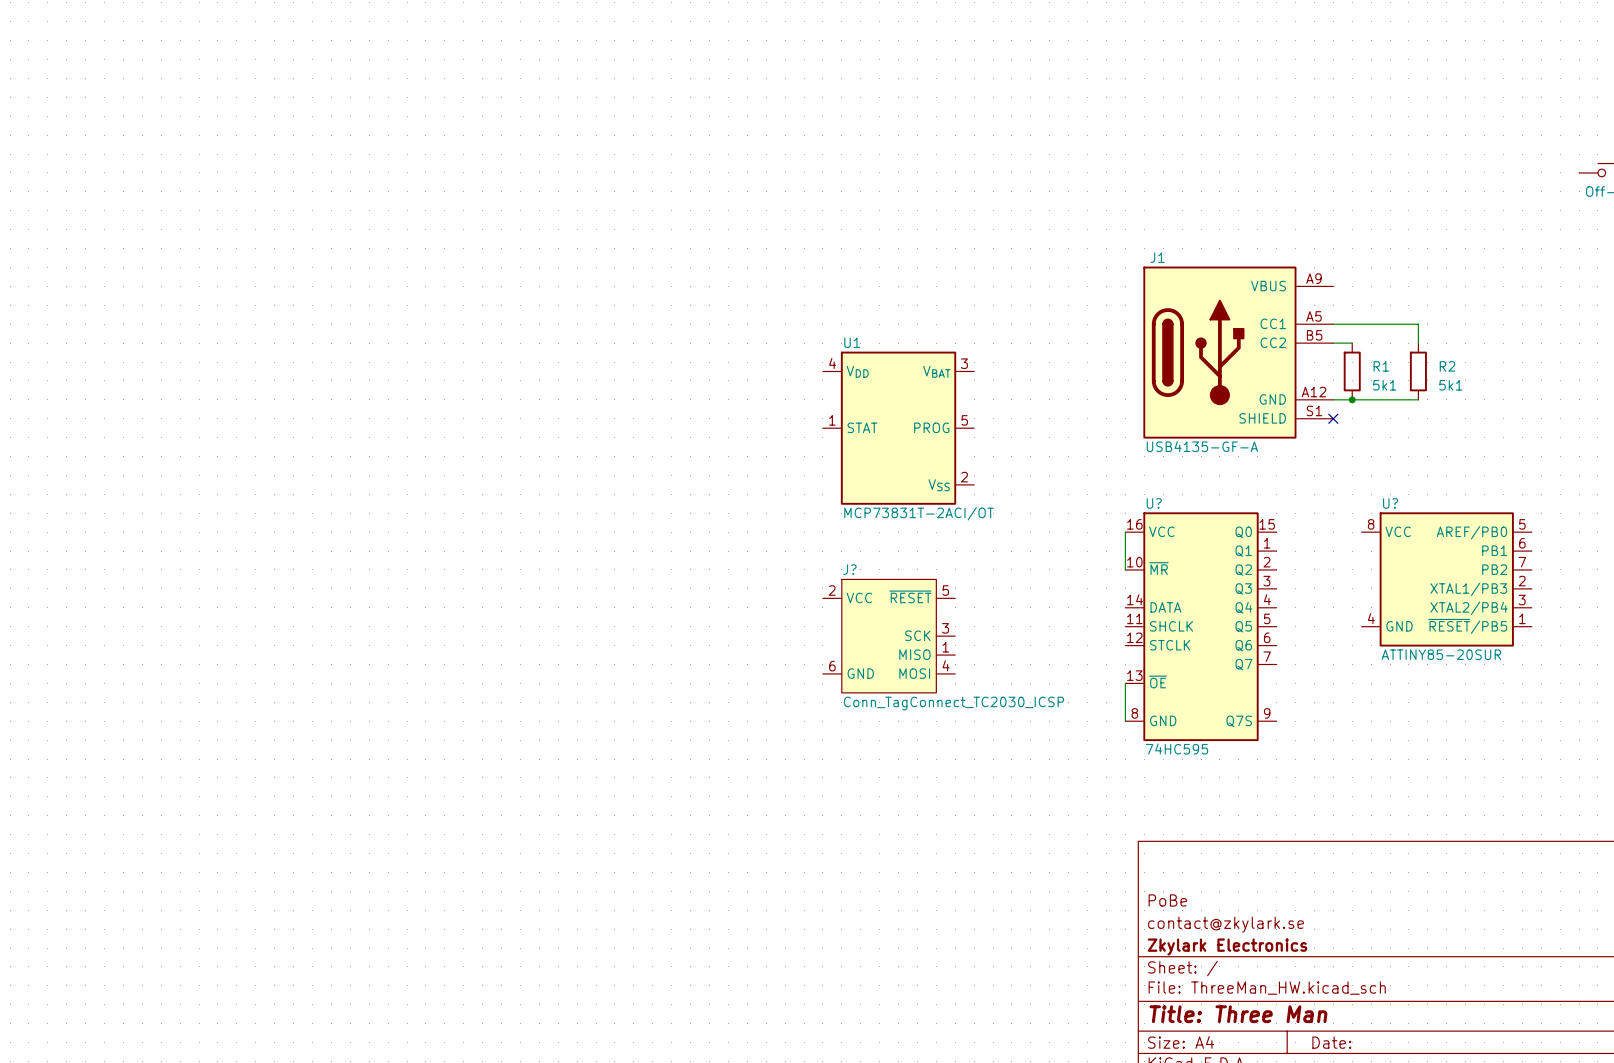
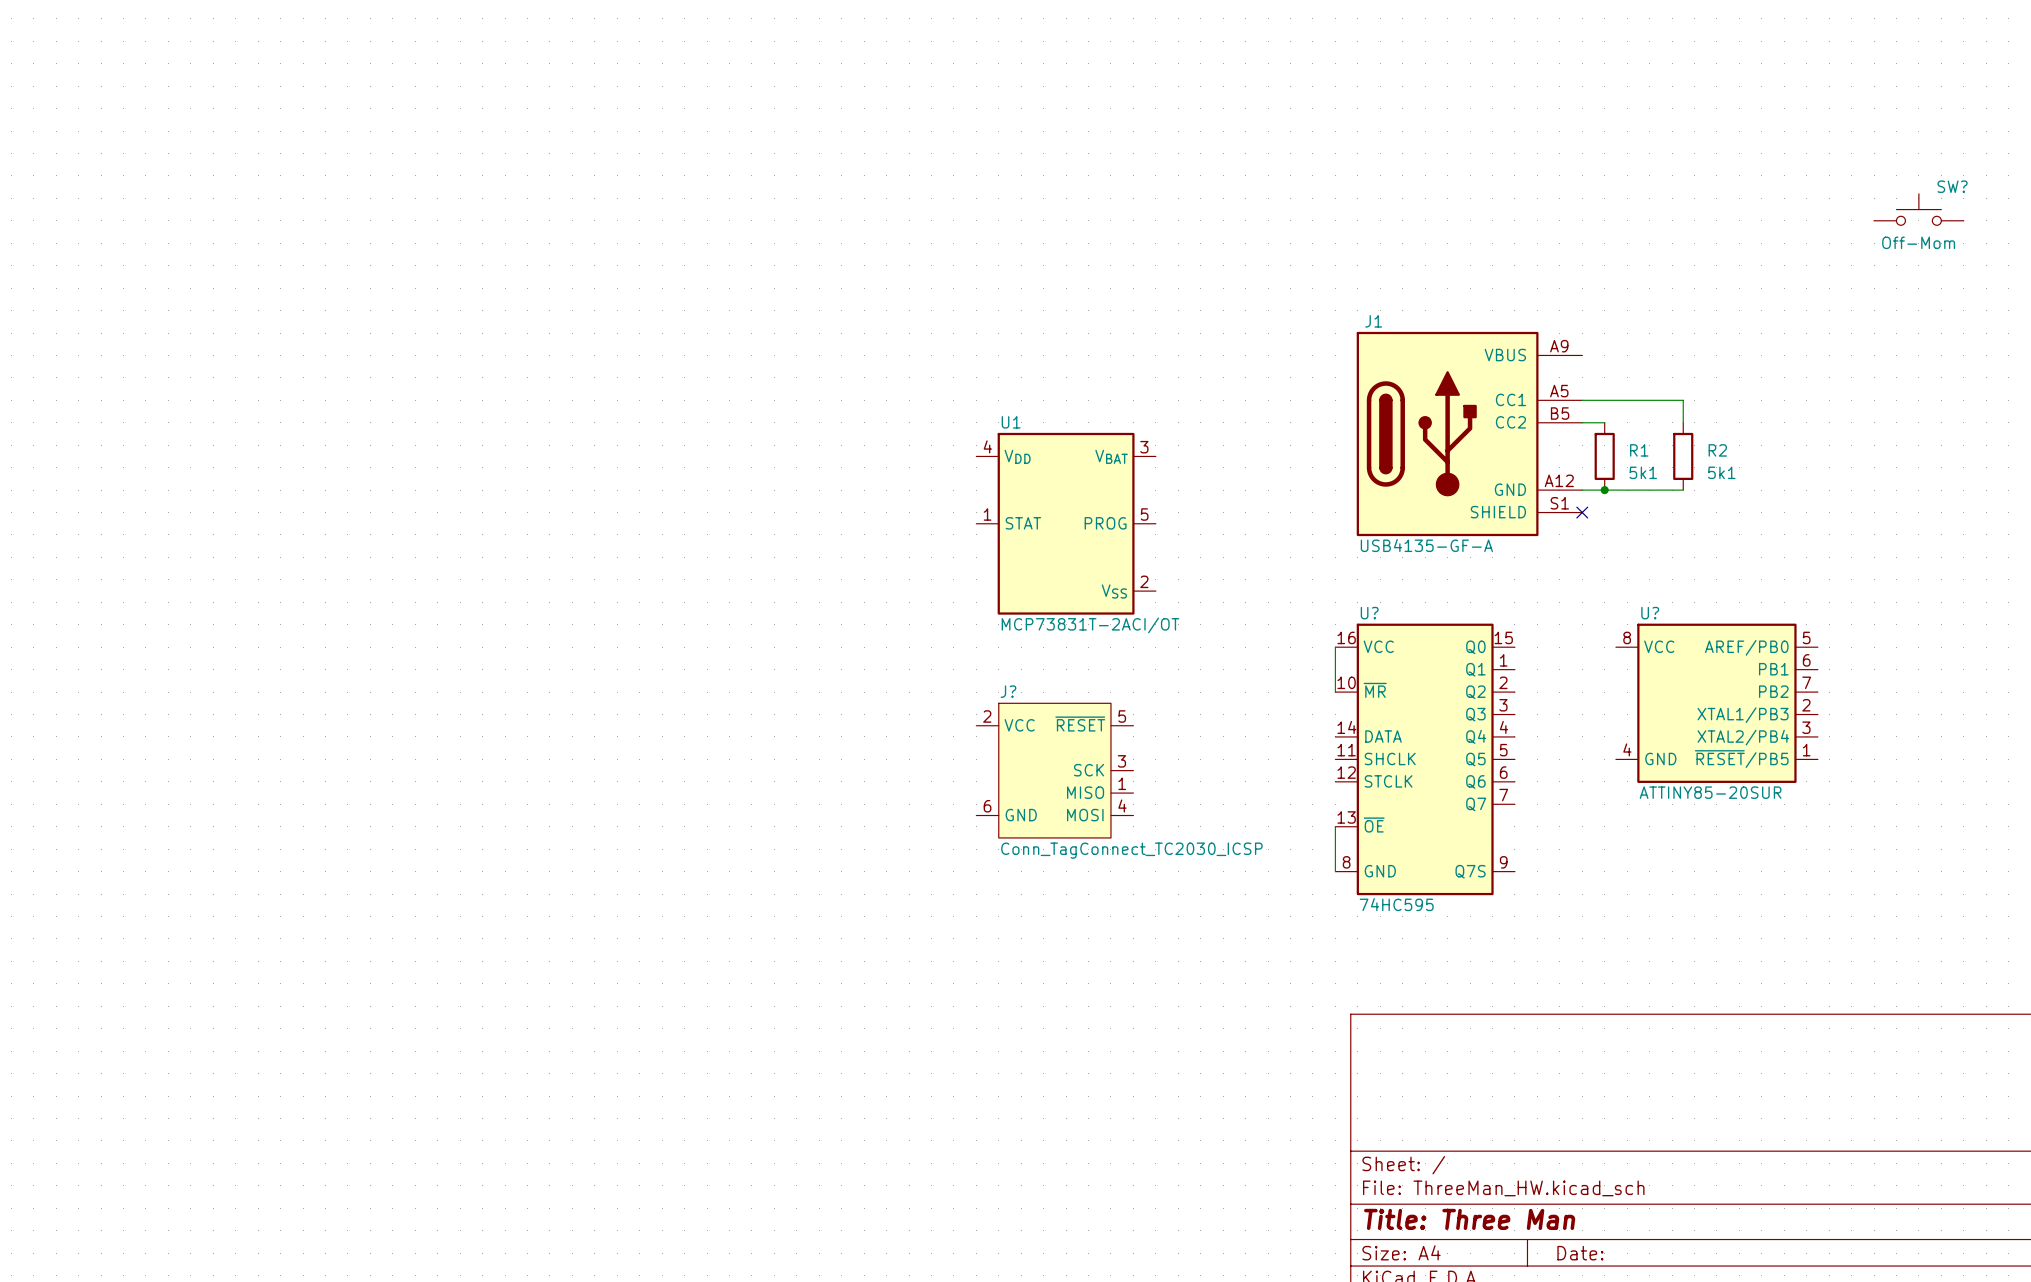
title block: PoBe (1167, 900) -> none
title block: contact@zkylark.se (1226, 924) -> none
title block: Zkylark Electronics (1227, 946) -> none

